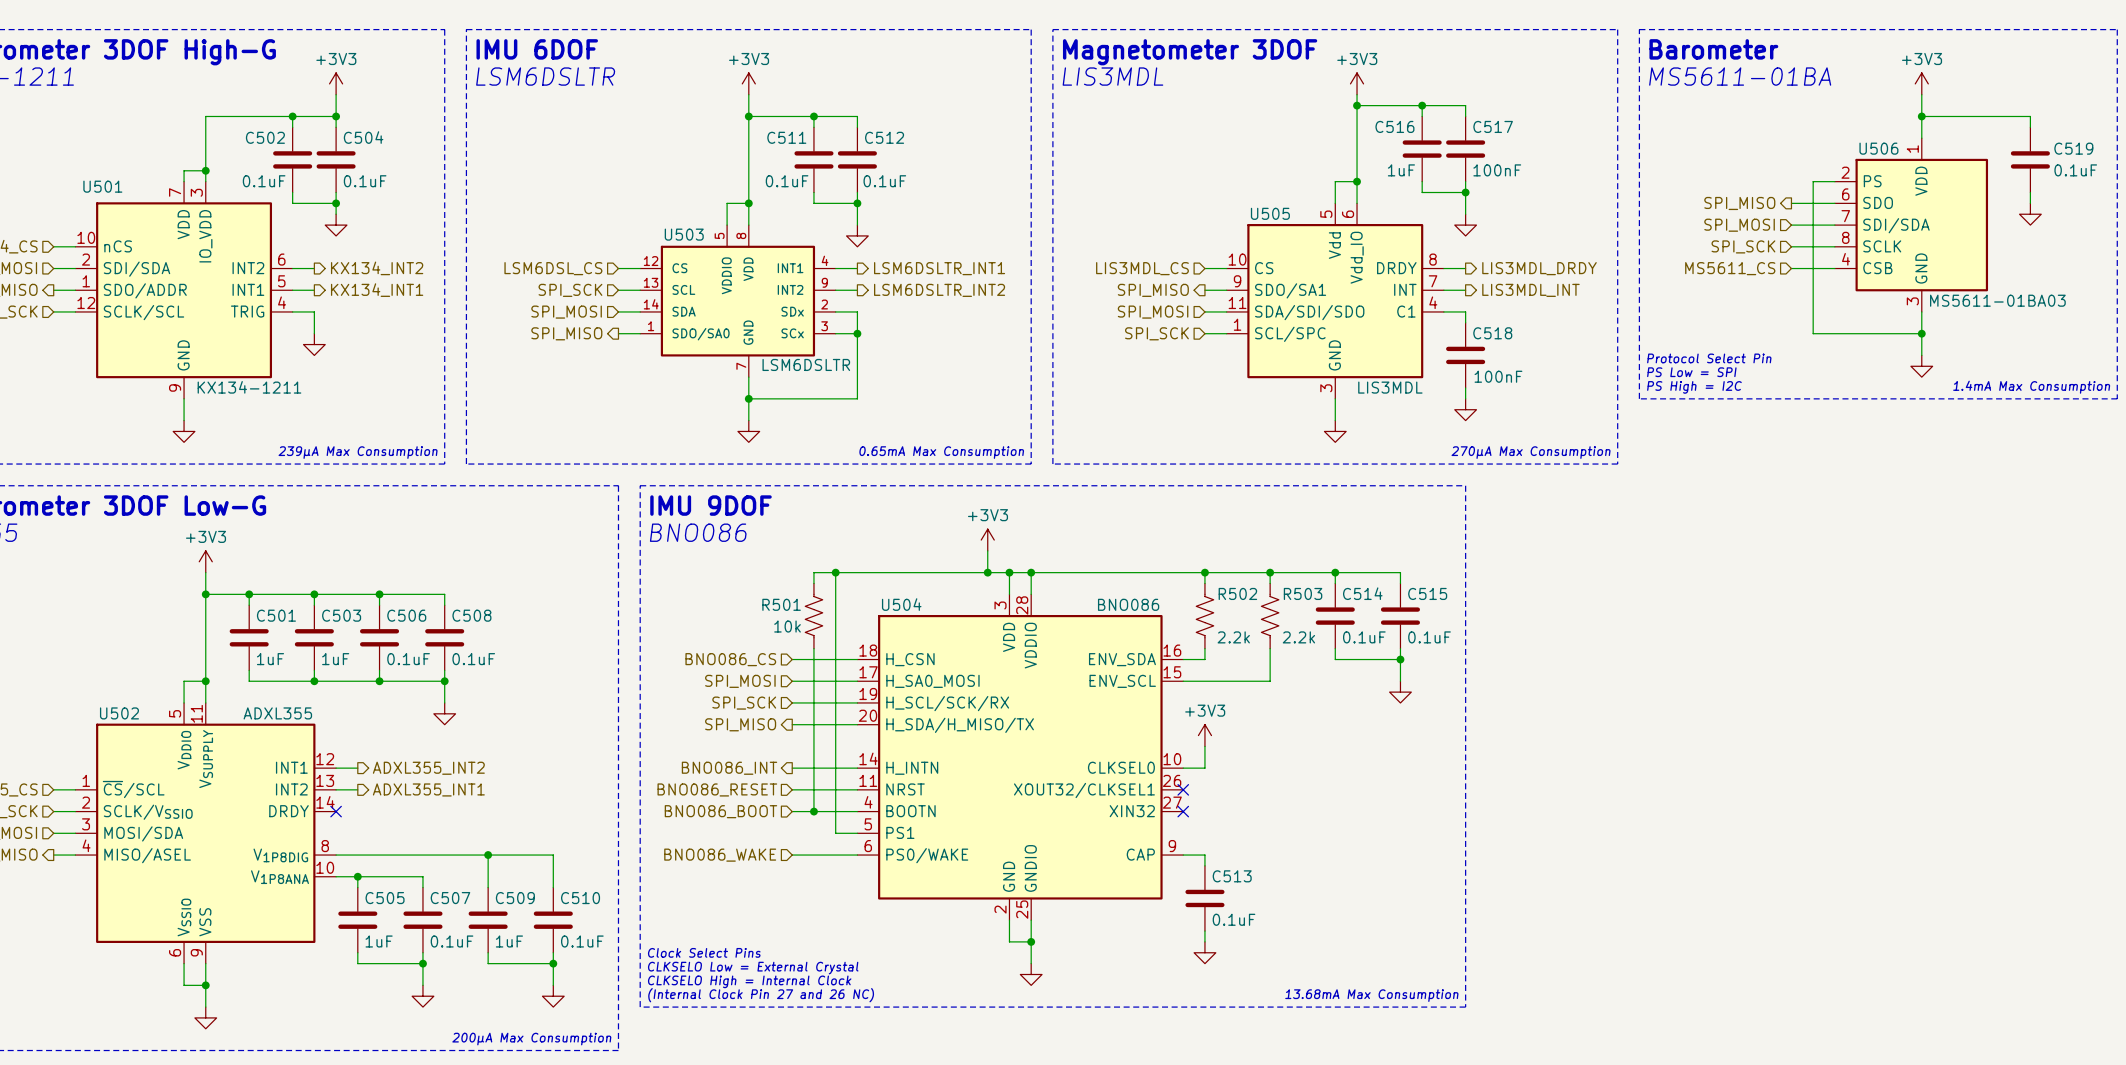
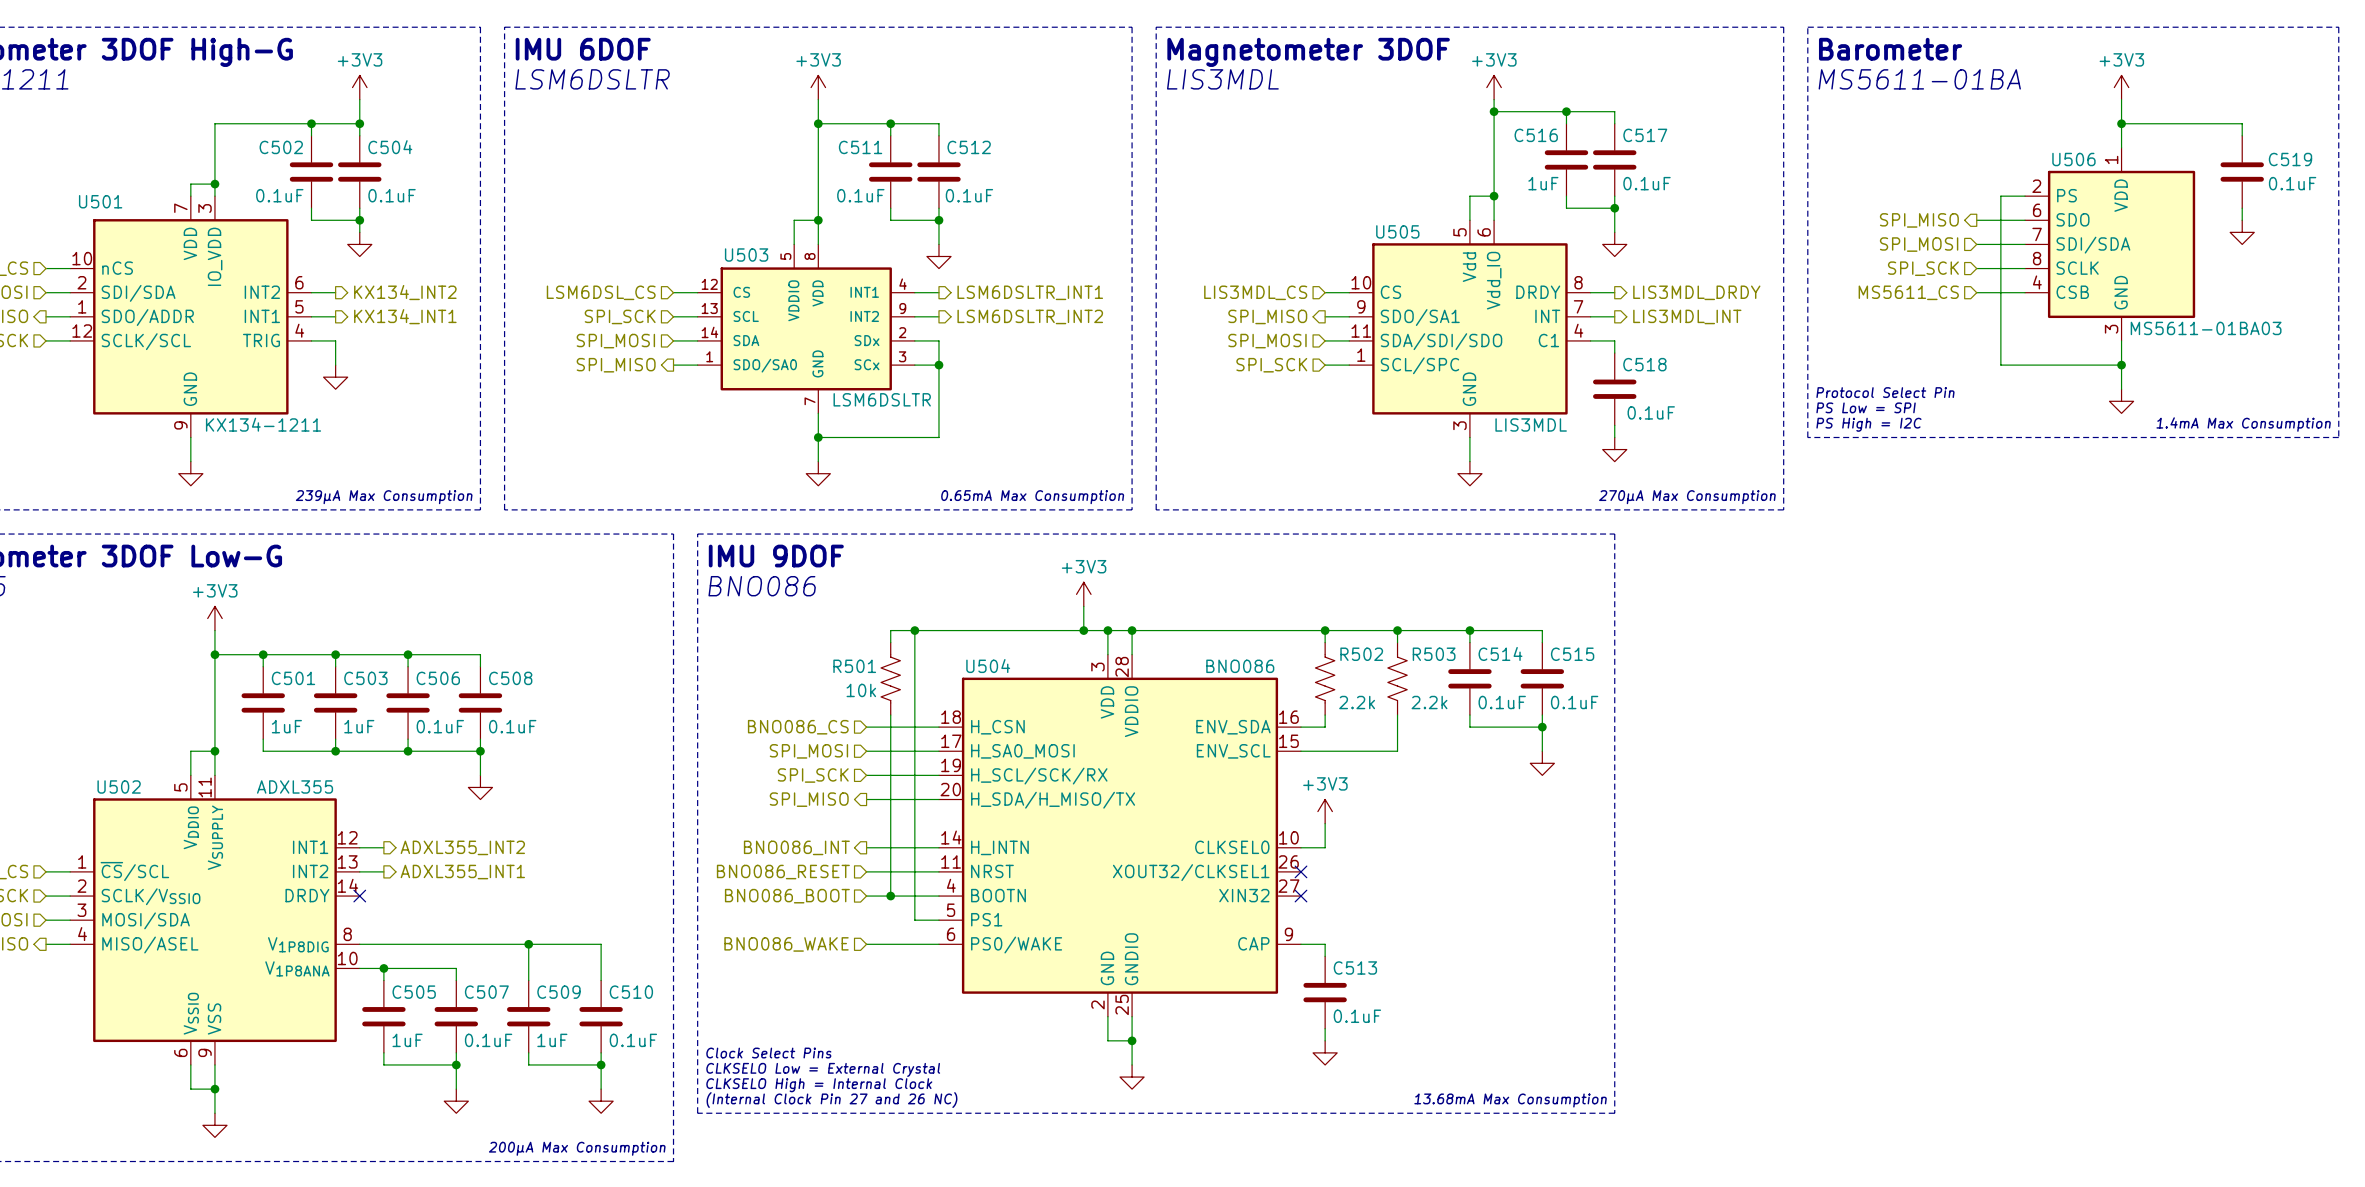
C517 value: 100nF (1497, 170) -> 0.1uF (1647, 183)
C518 value: 100nF (1498, 376) -> 0.1uF (1651, 412)

